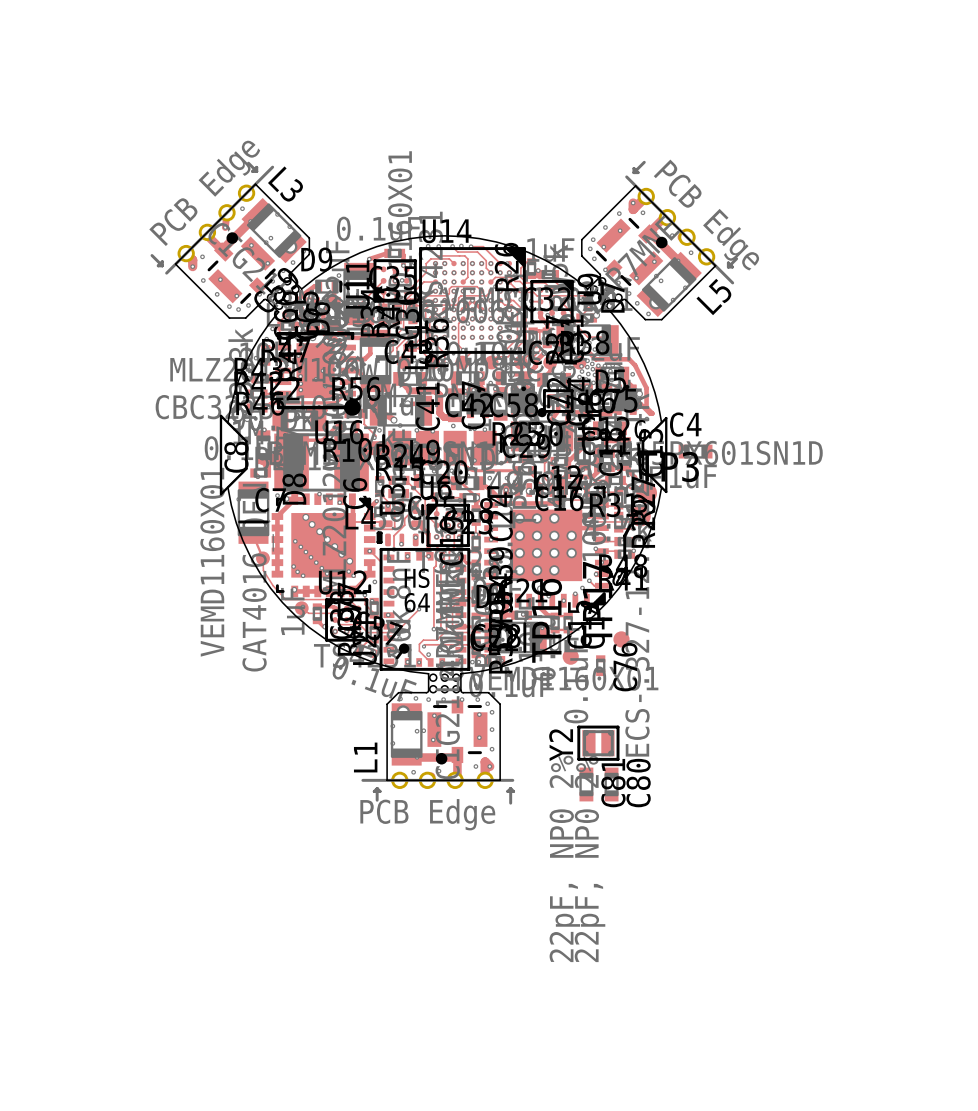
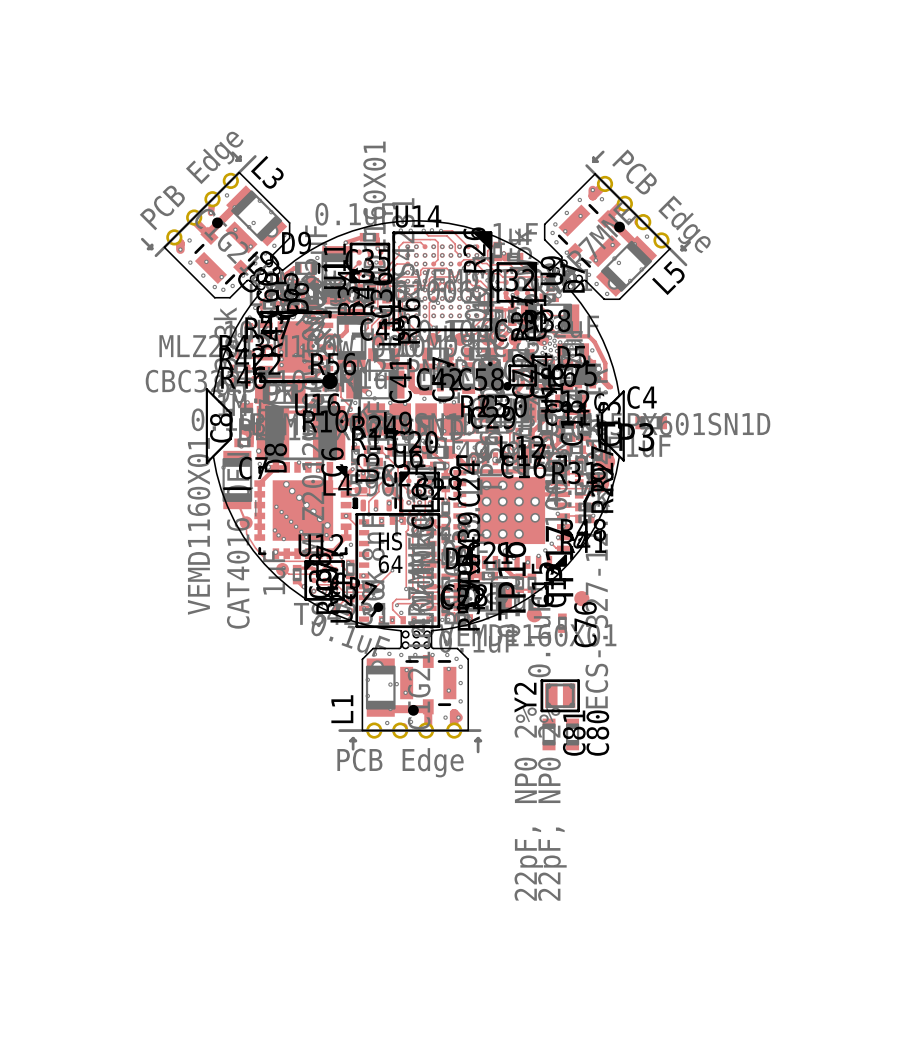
via: none -> (258, 451)

